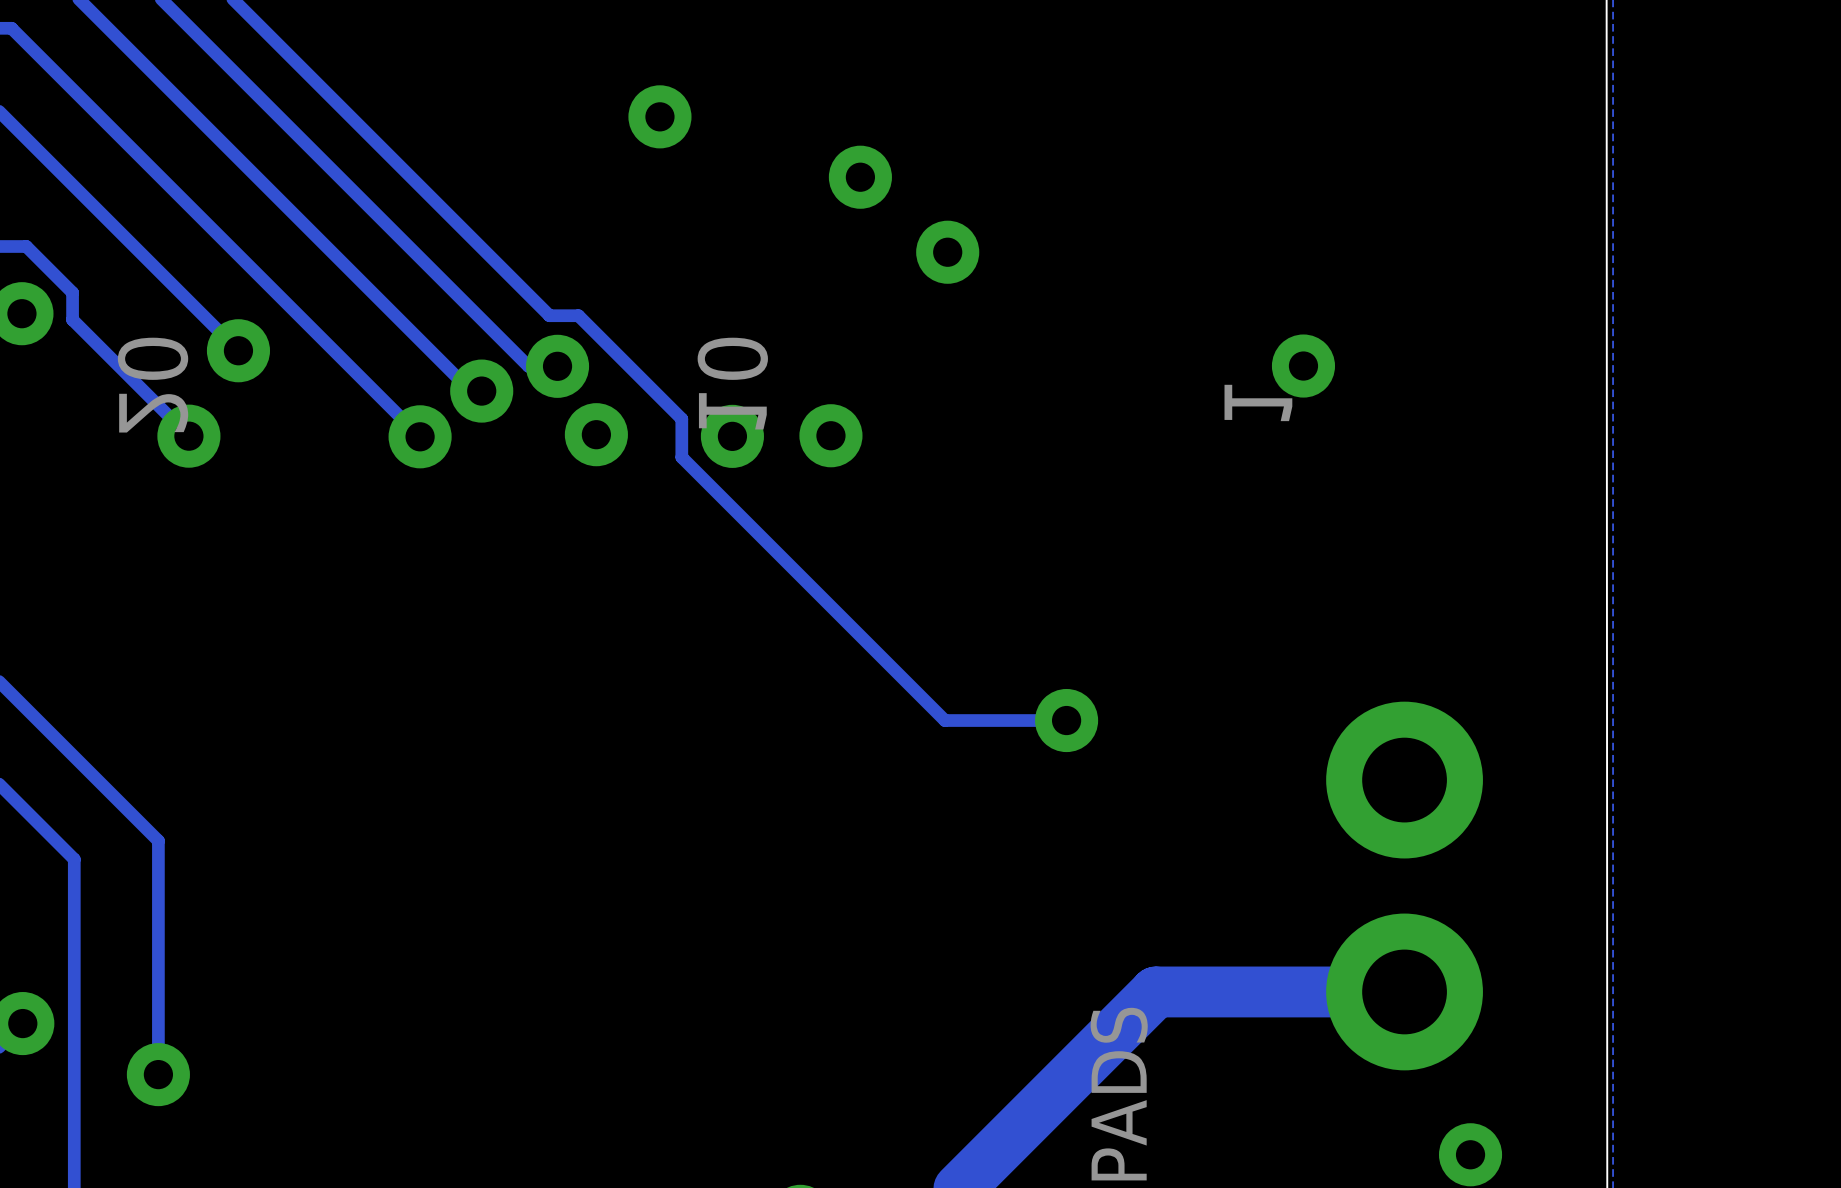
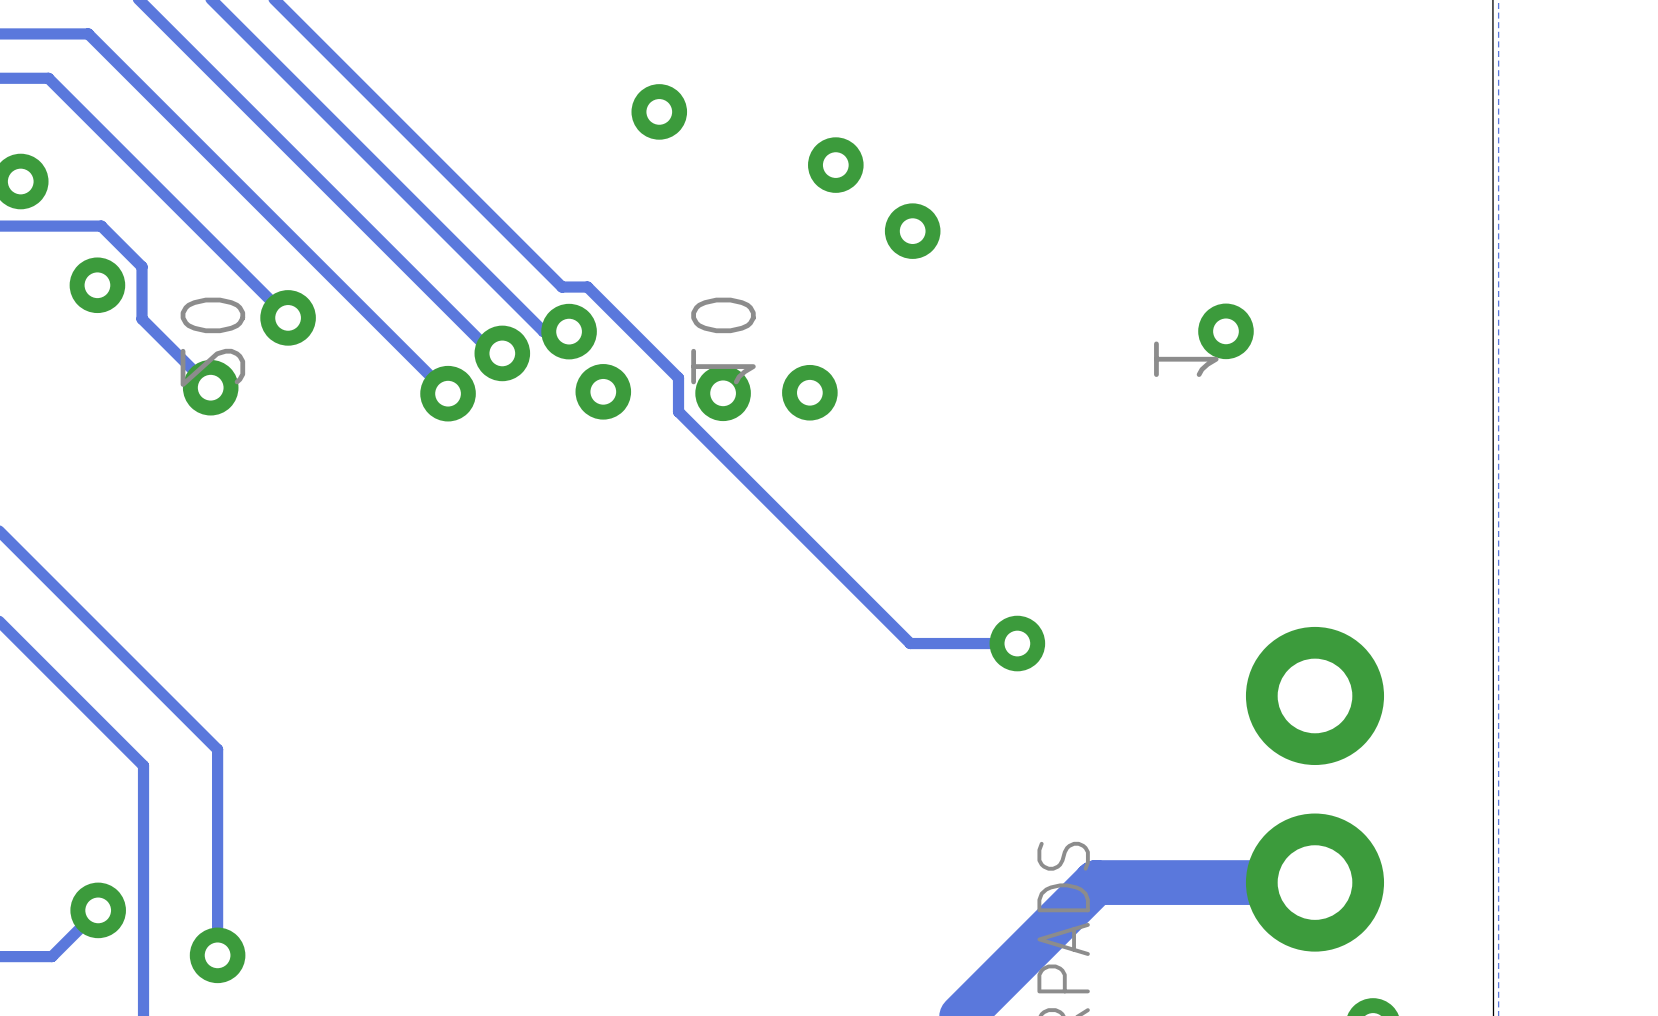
track: (72, 319) (188, 436) -> (142, 290) (142, 319) (210, 387)
via position: (188, 436) -> (210, 387)

